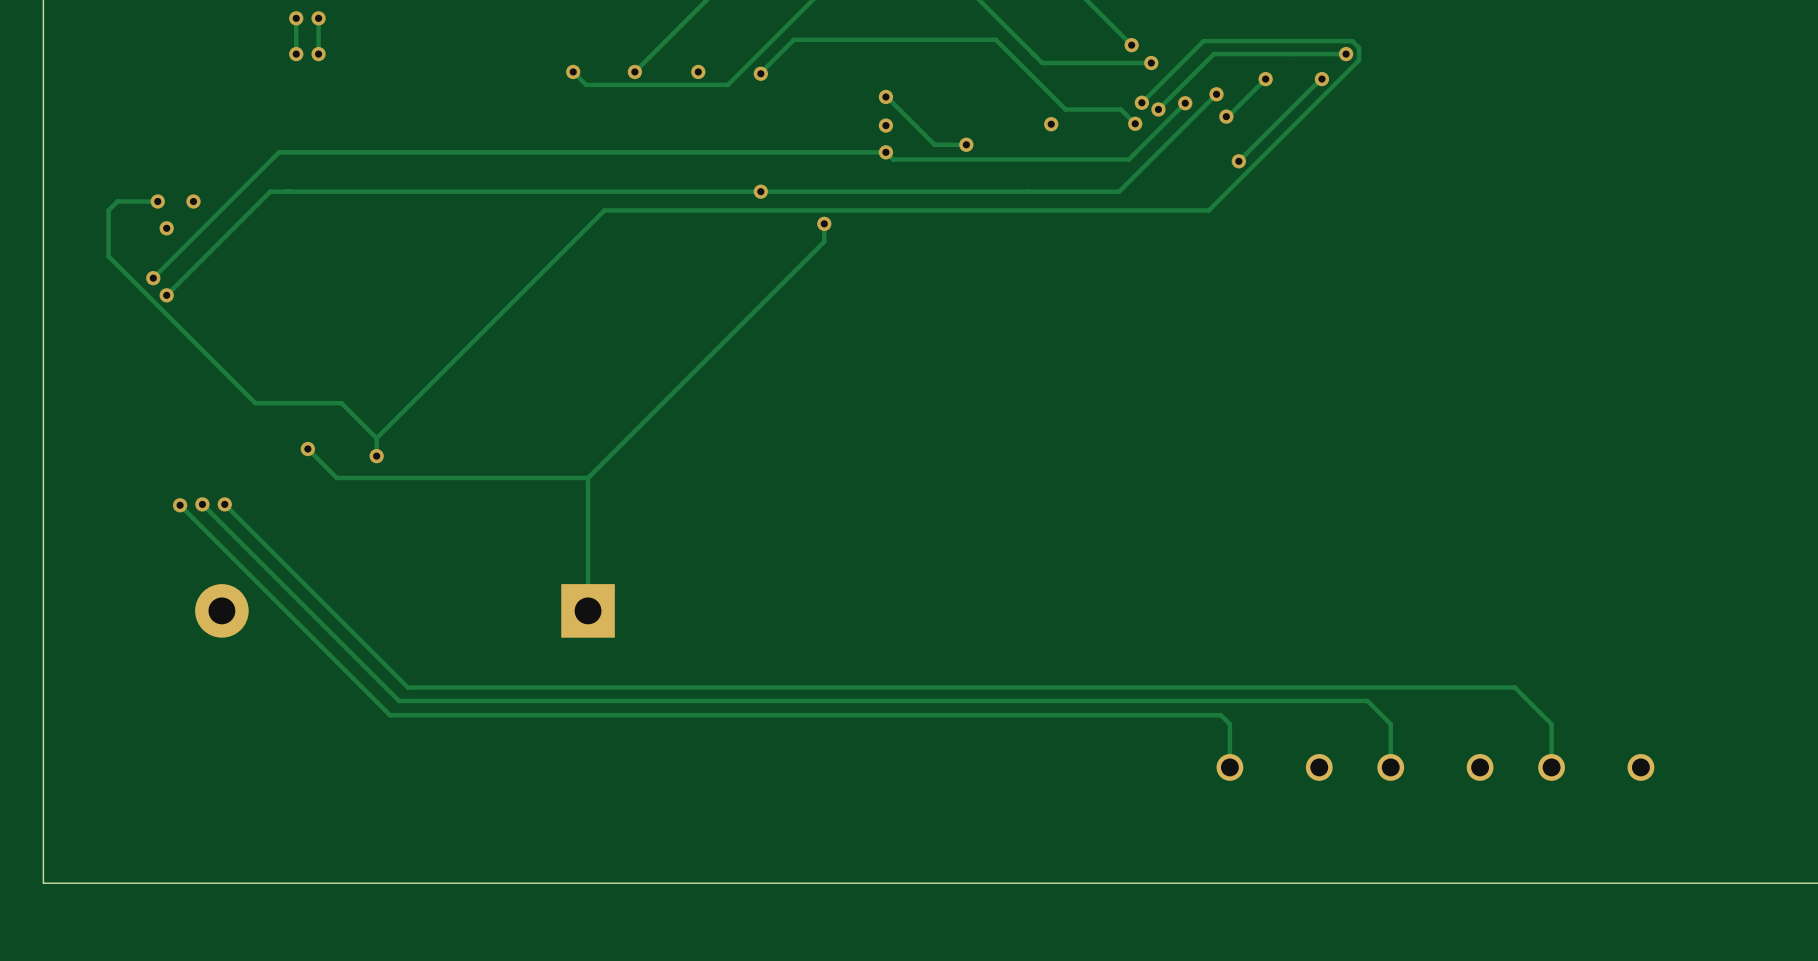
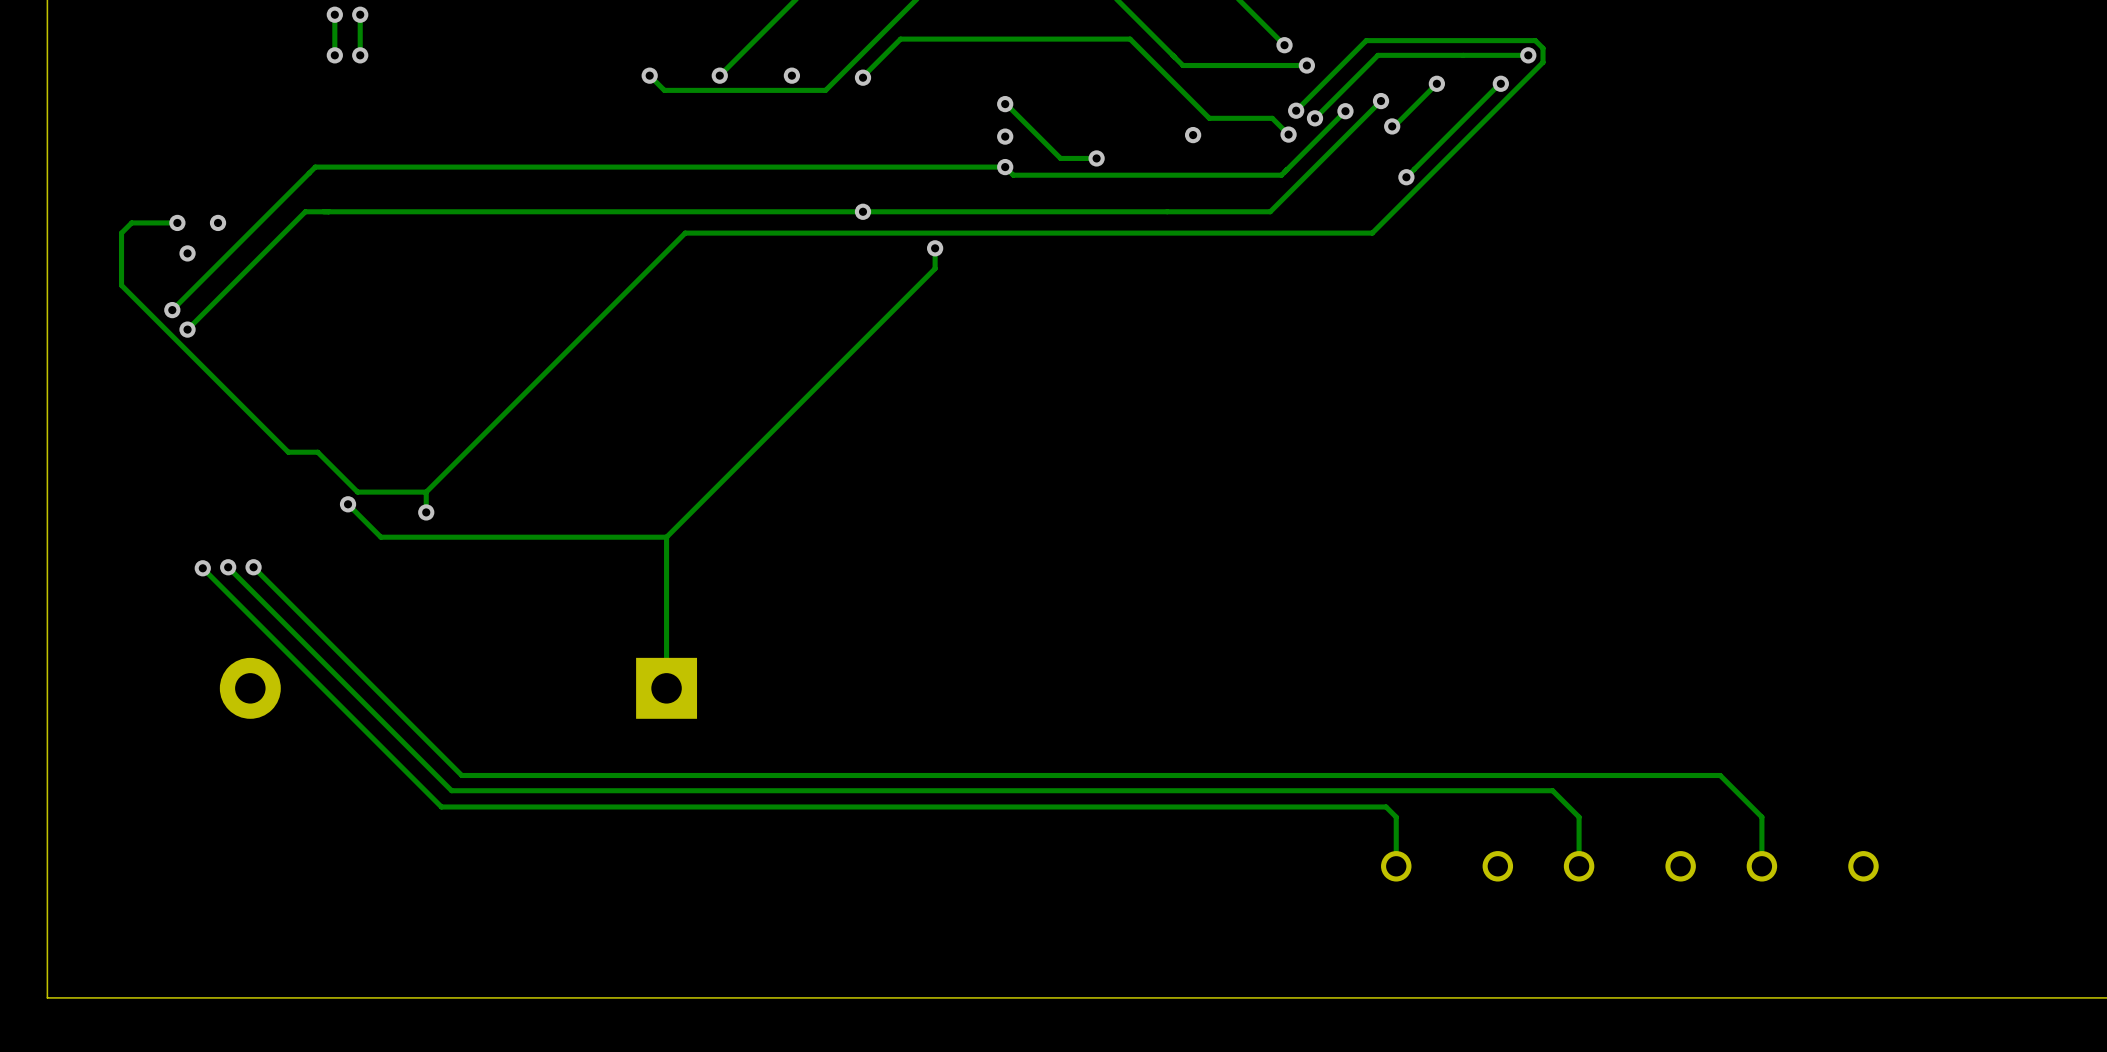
track: (281, 403) (341, 403) (376, 438) -> (317, 452) (357, 492) (426, 492)

